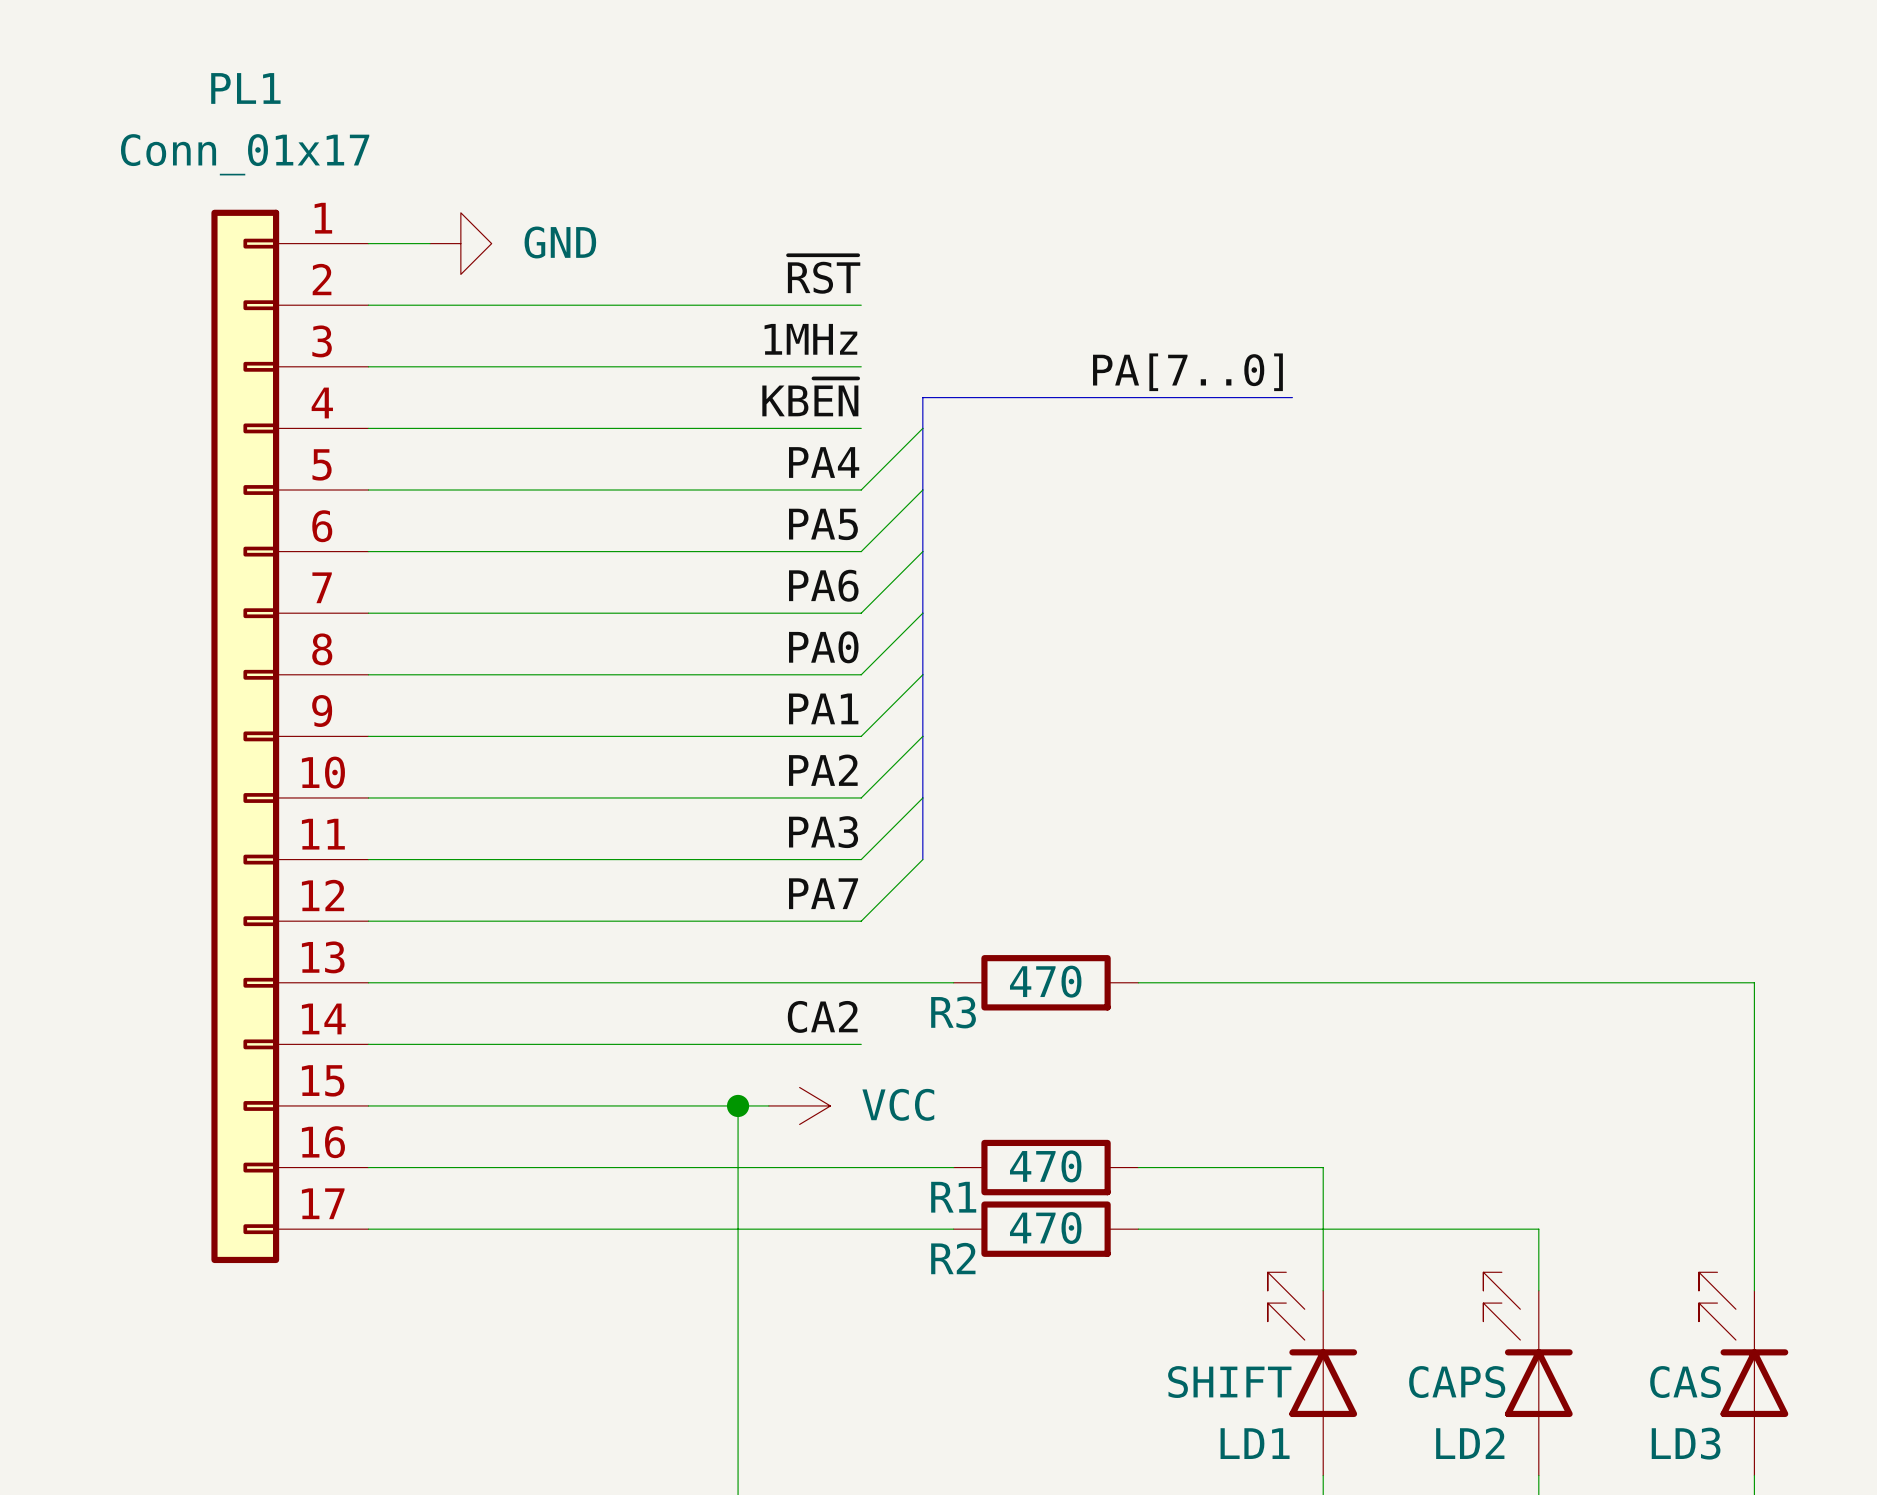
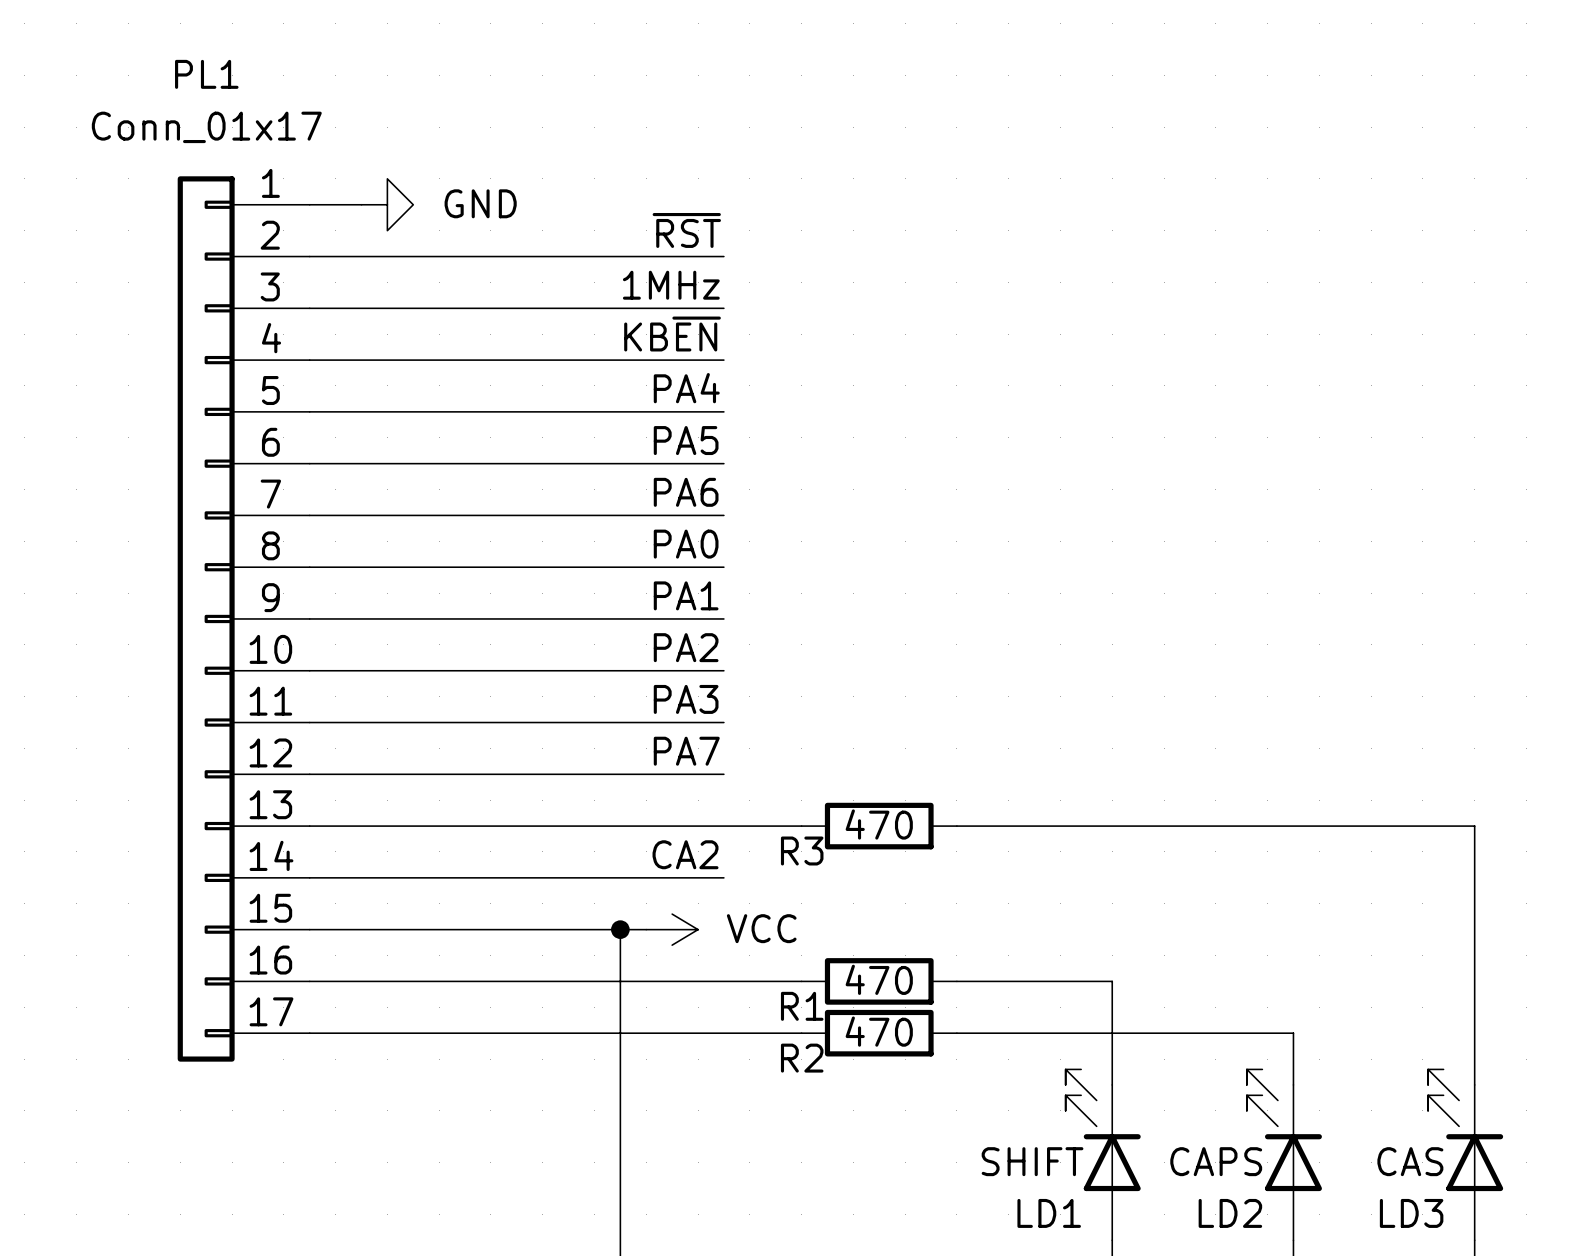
label: PA[7..0] (1187, 372) -> none
bus: (1292, 397) (922, 397) (922, 859) -> none
wire: (922, 428) (861, 490) -> none
wire: (922, 490) (861, 551) -> none
wire: (922, 551) (861, 613) -> none
wire: (922, 613) (861, 674) -> none
wire: (922, 674) (861, 736) -> none
wire: (922, 736) (861, 797) -> none
wire: (922, 797) (861, 859) -> none
wire: (922, 859) (861, 921) -> none

